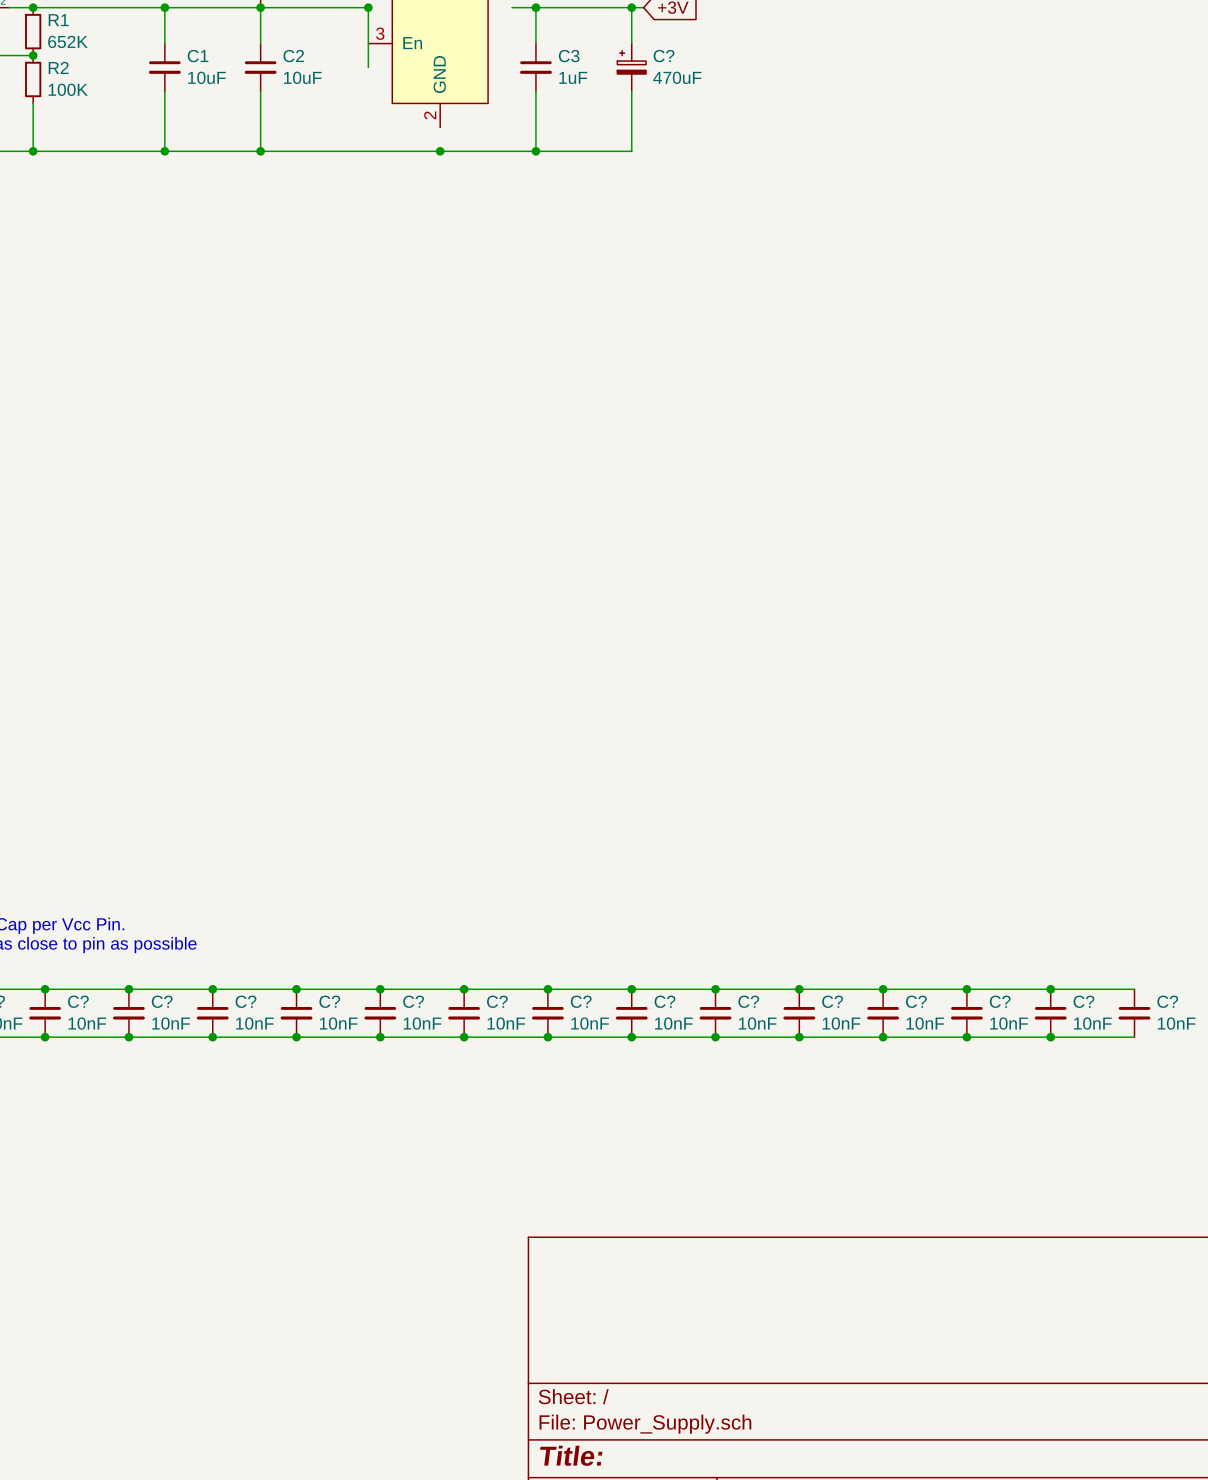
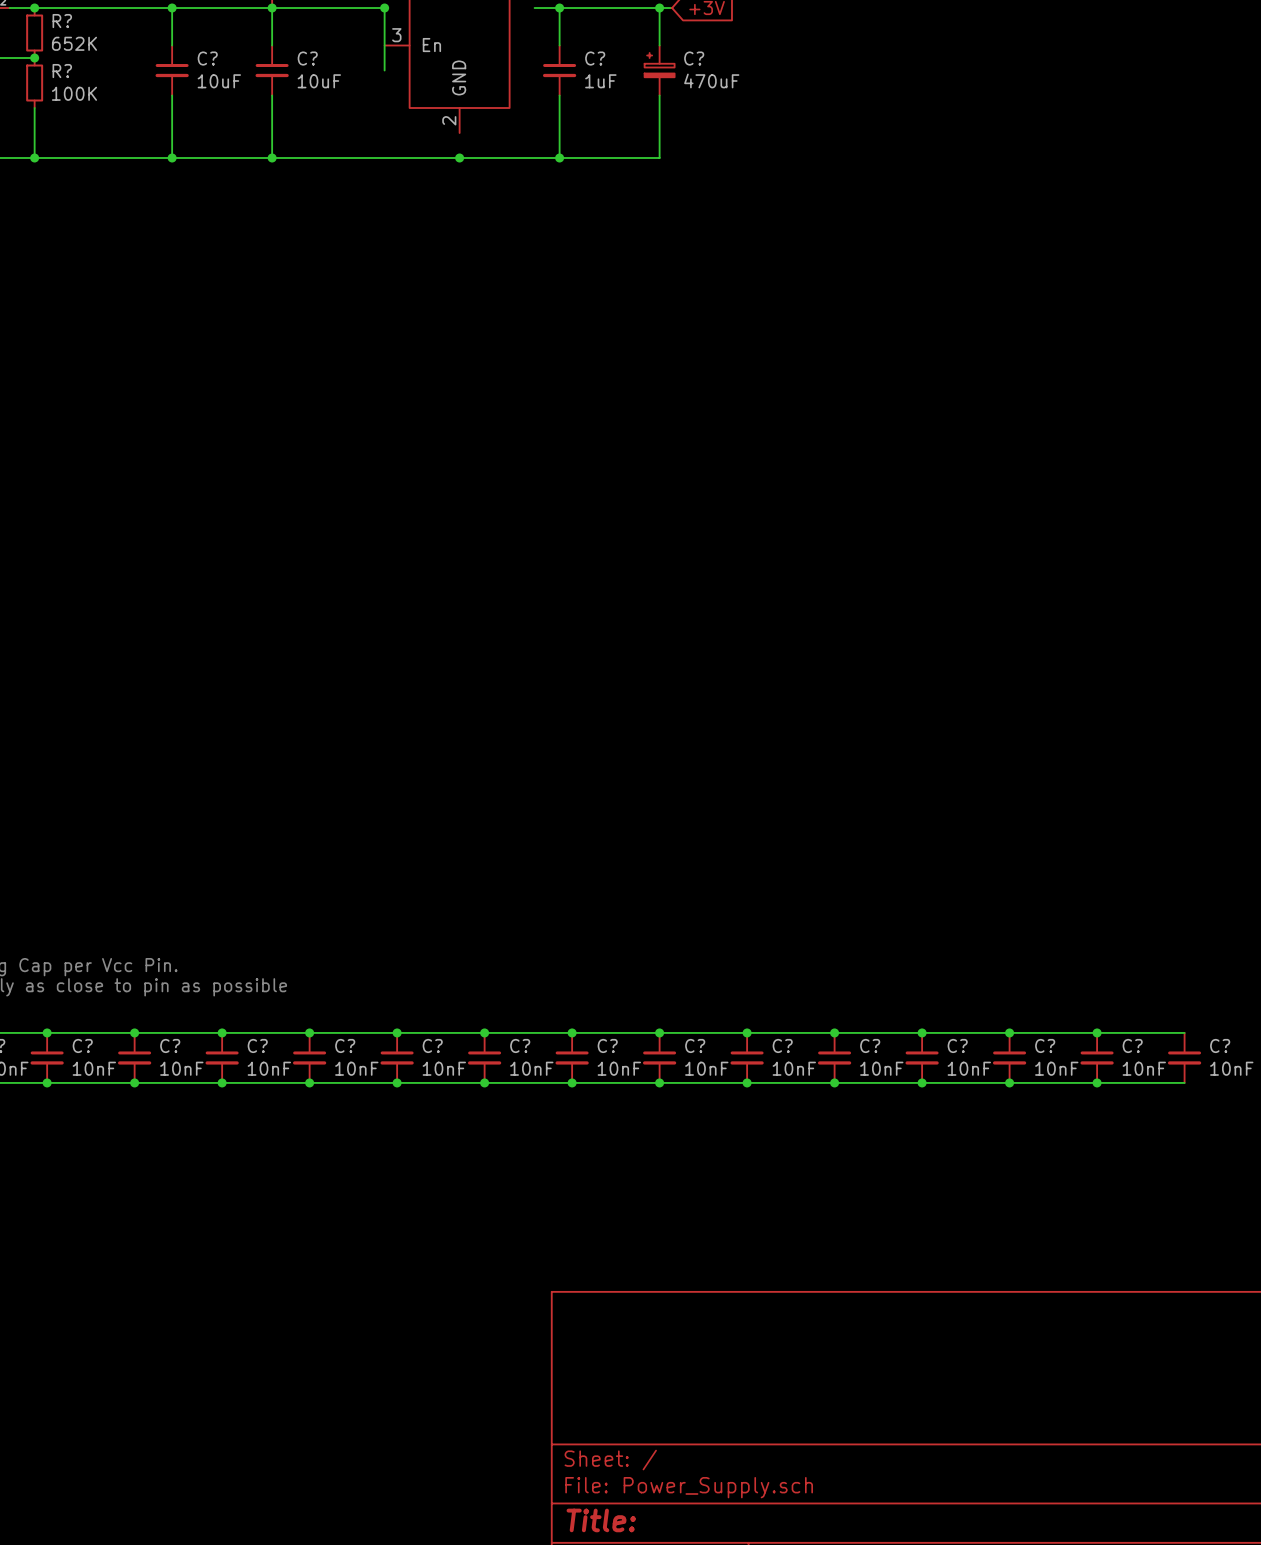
R1 name: R1 (58, 20) -> R? (62, 21)
C1 name: C1 (198, 56) -> C? (207, 58)
C2 name: C2 (293, 56) -> C? (307, 58)
C3 name: C3 (569, 56) -> C? (595, 58)
R2 name: R2 (58, 67) -> R? (62, 71)

